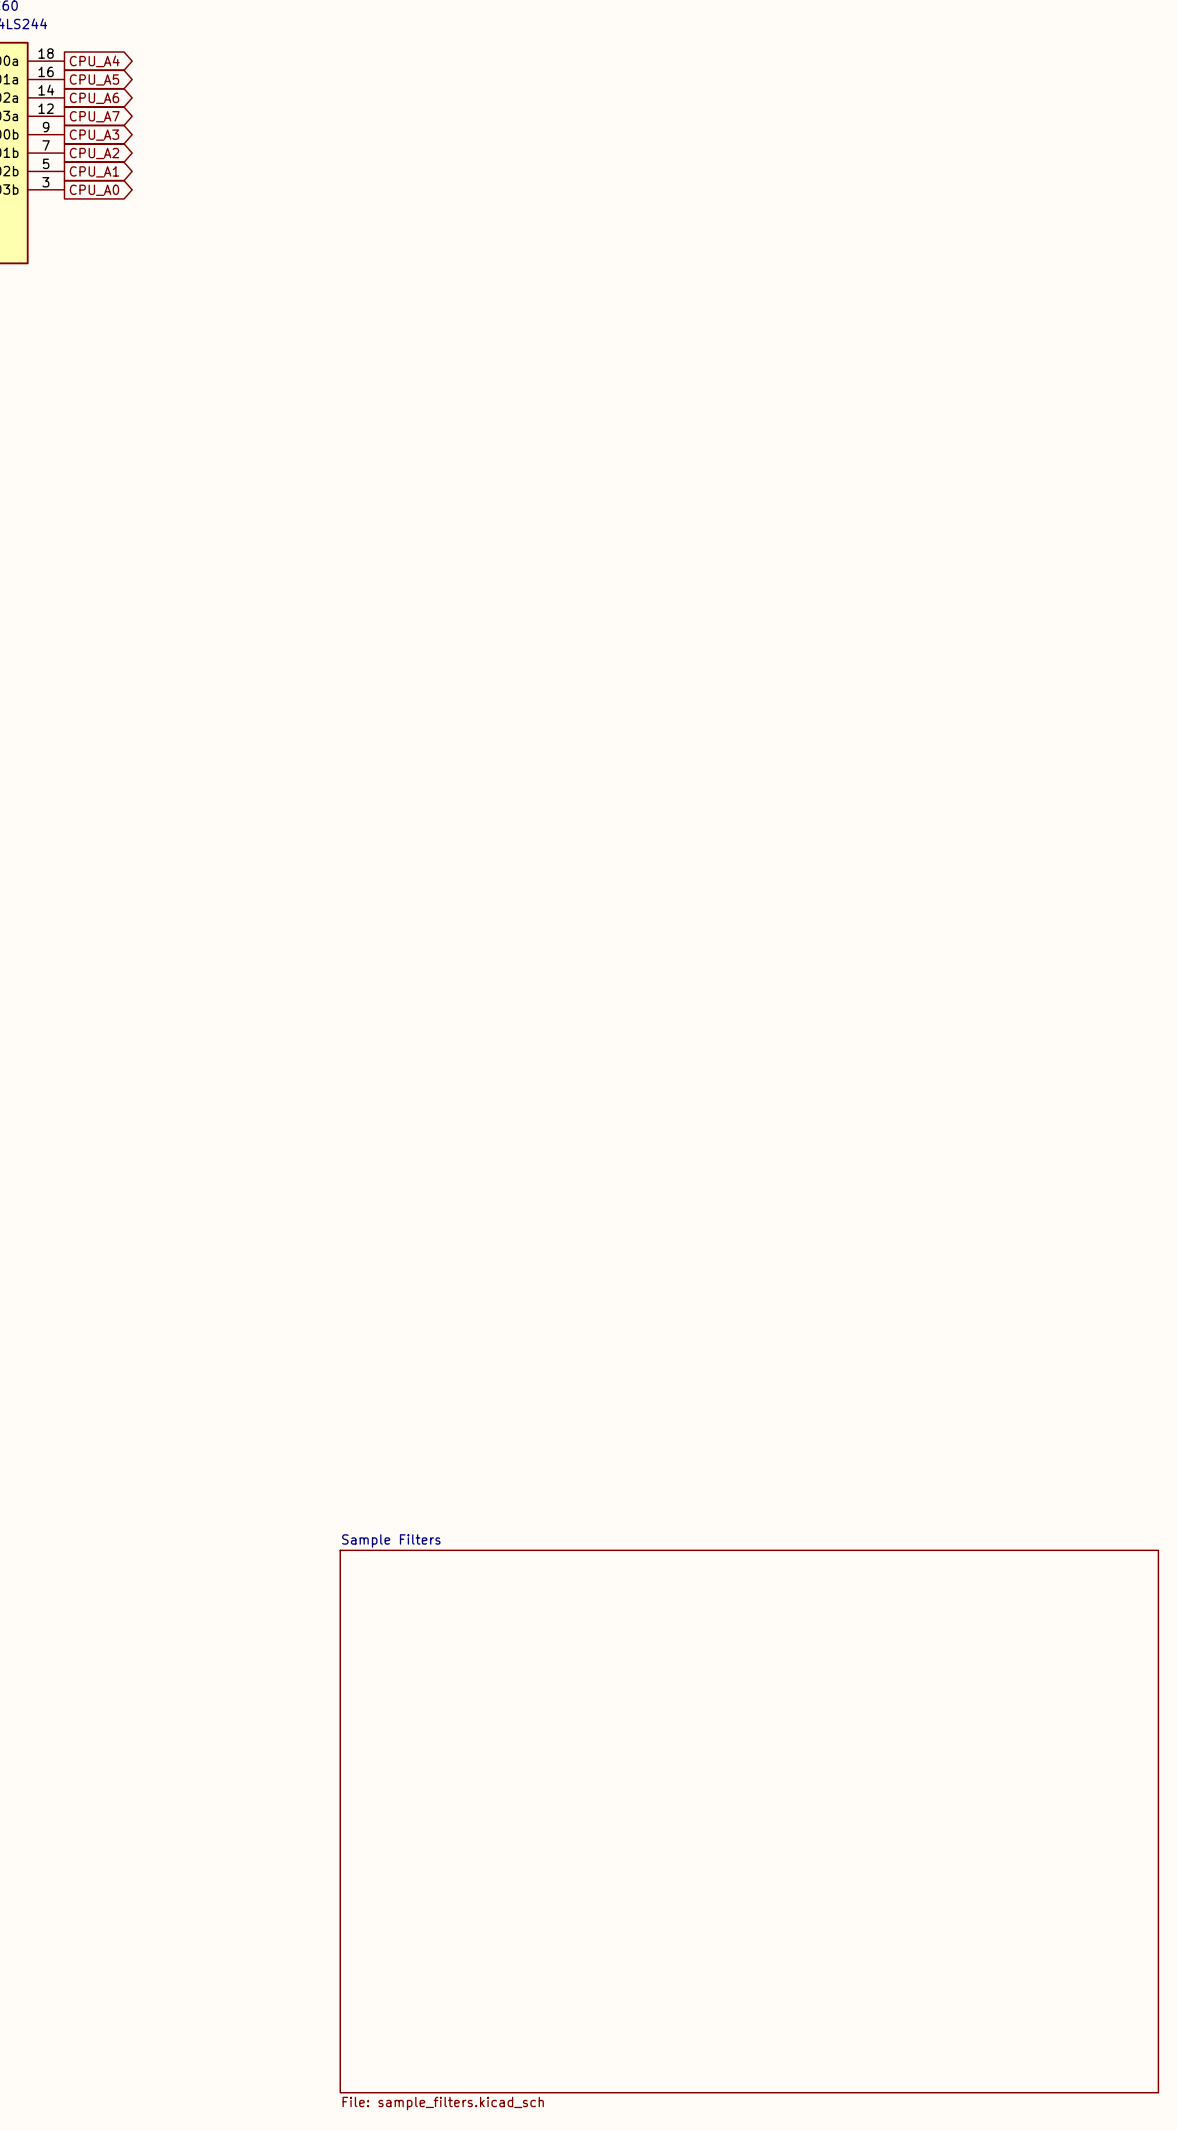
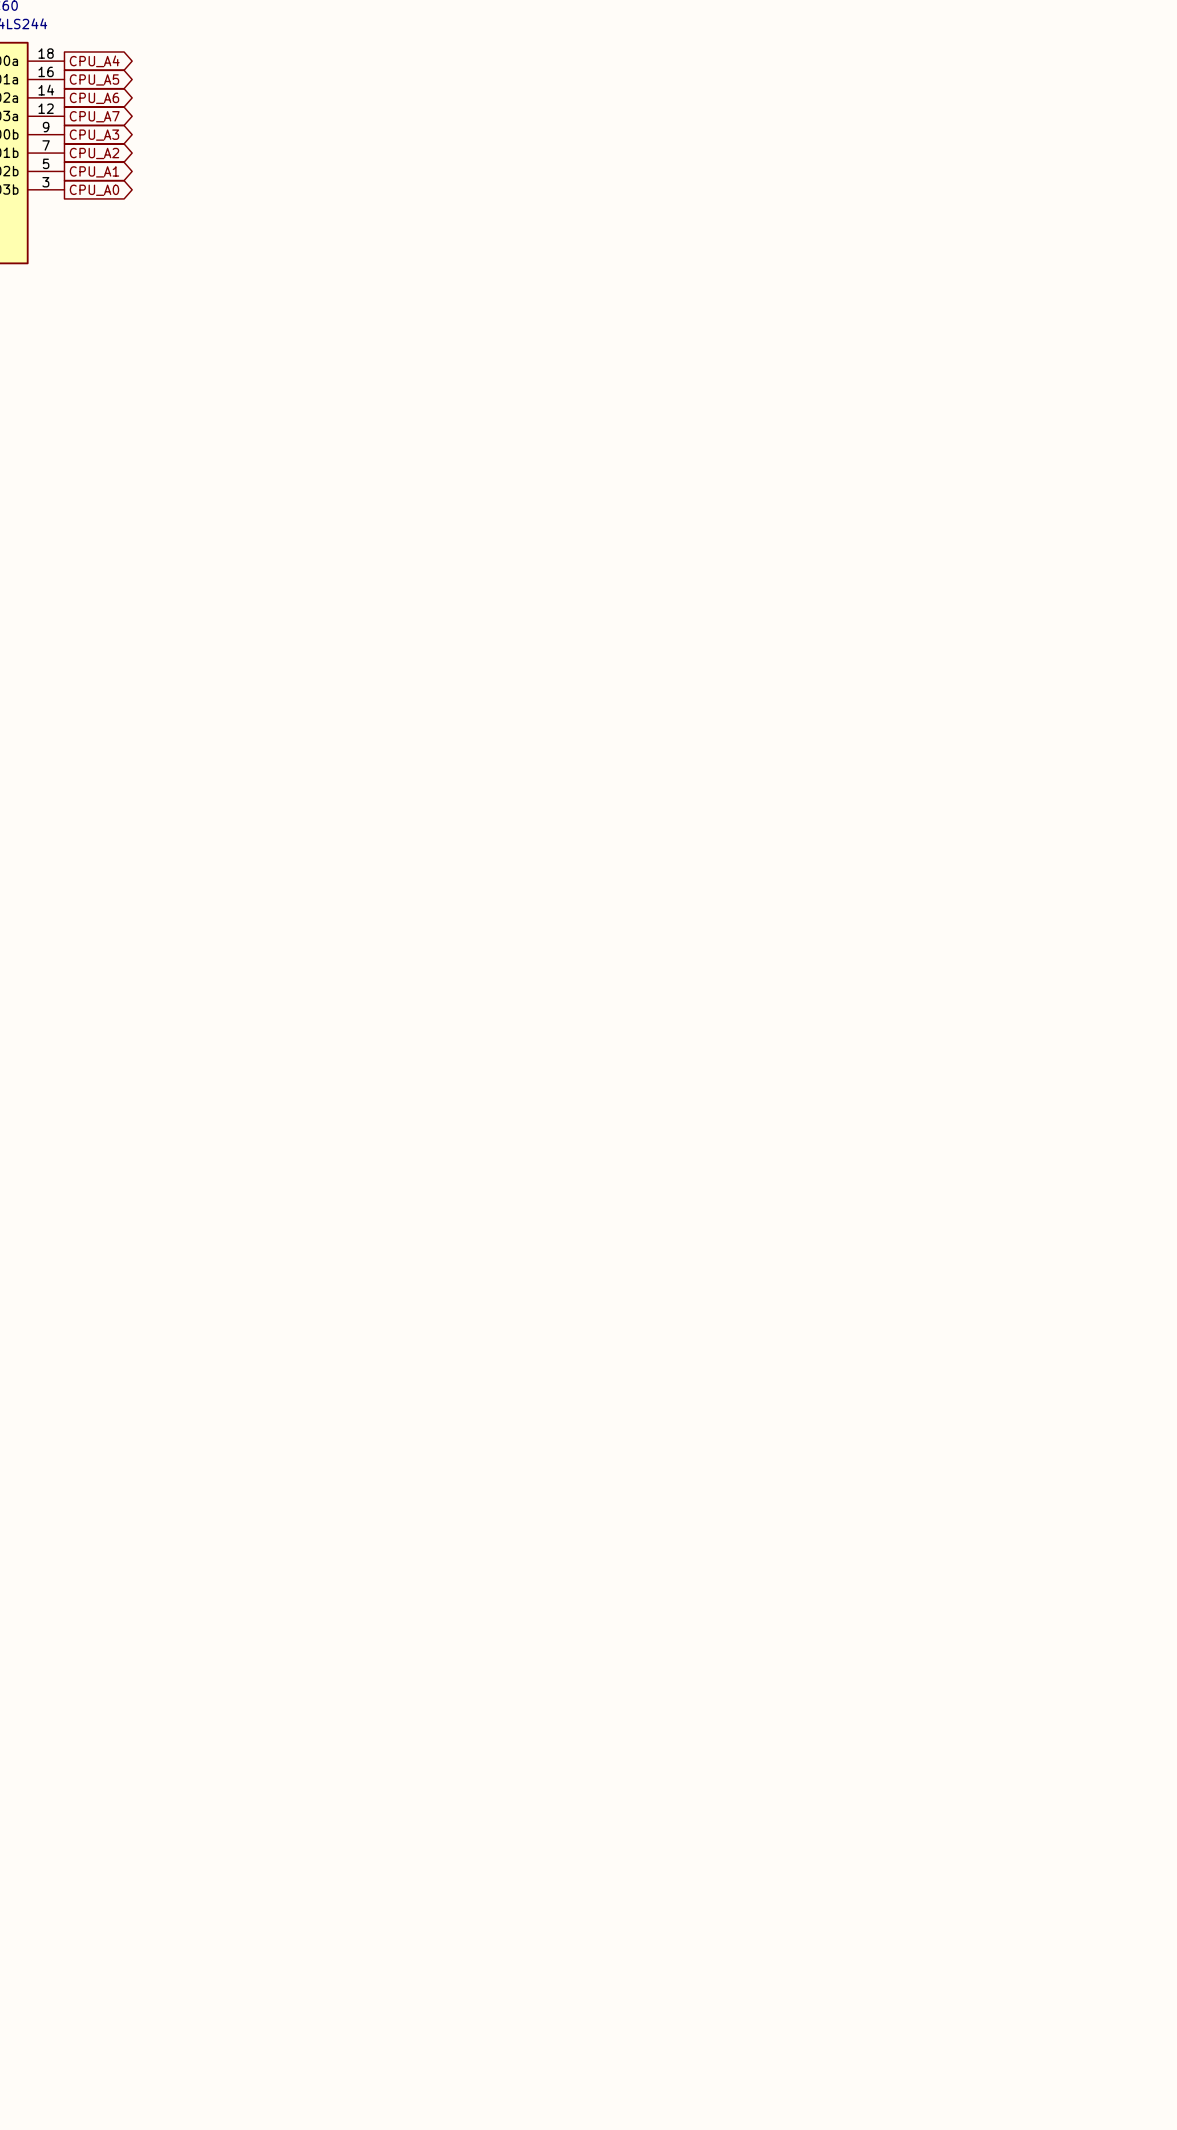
sheet Sample Filters: File: sample_filters.kicad_sch (749, 1821) -> none

